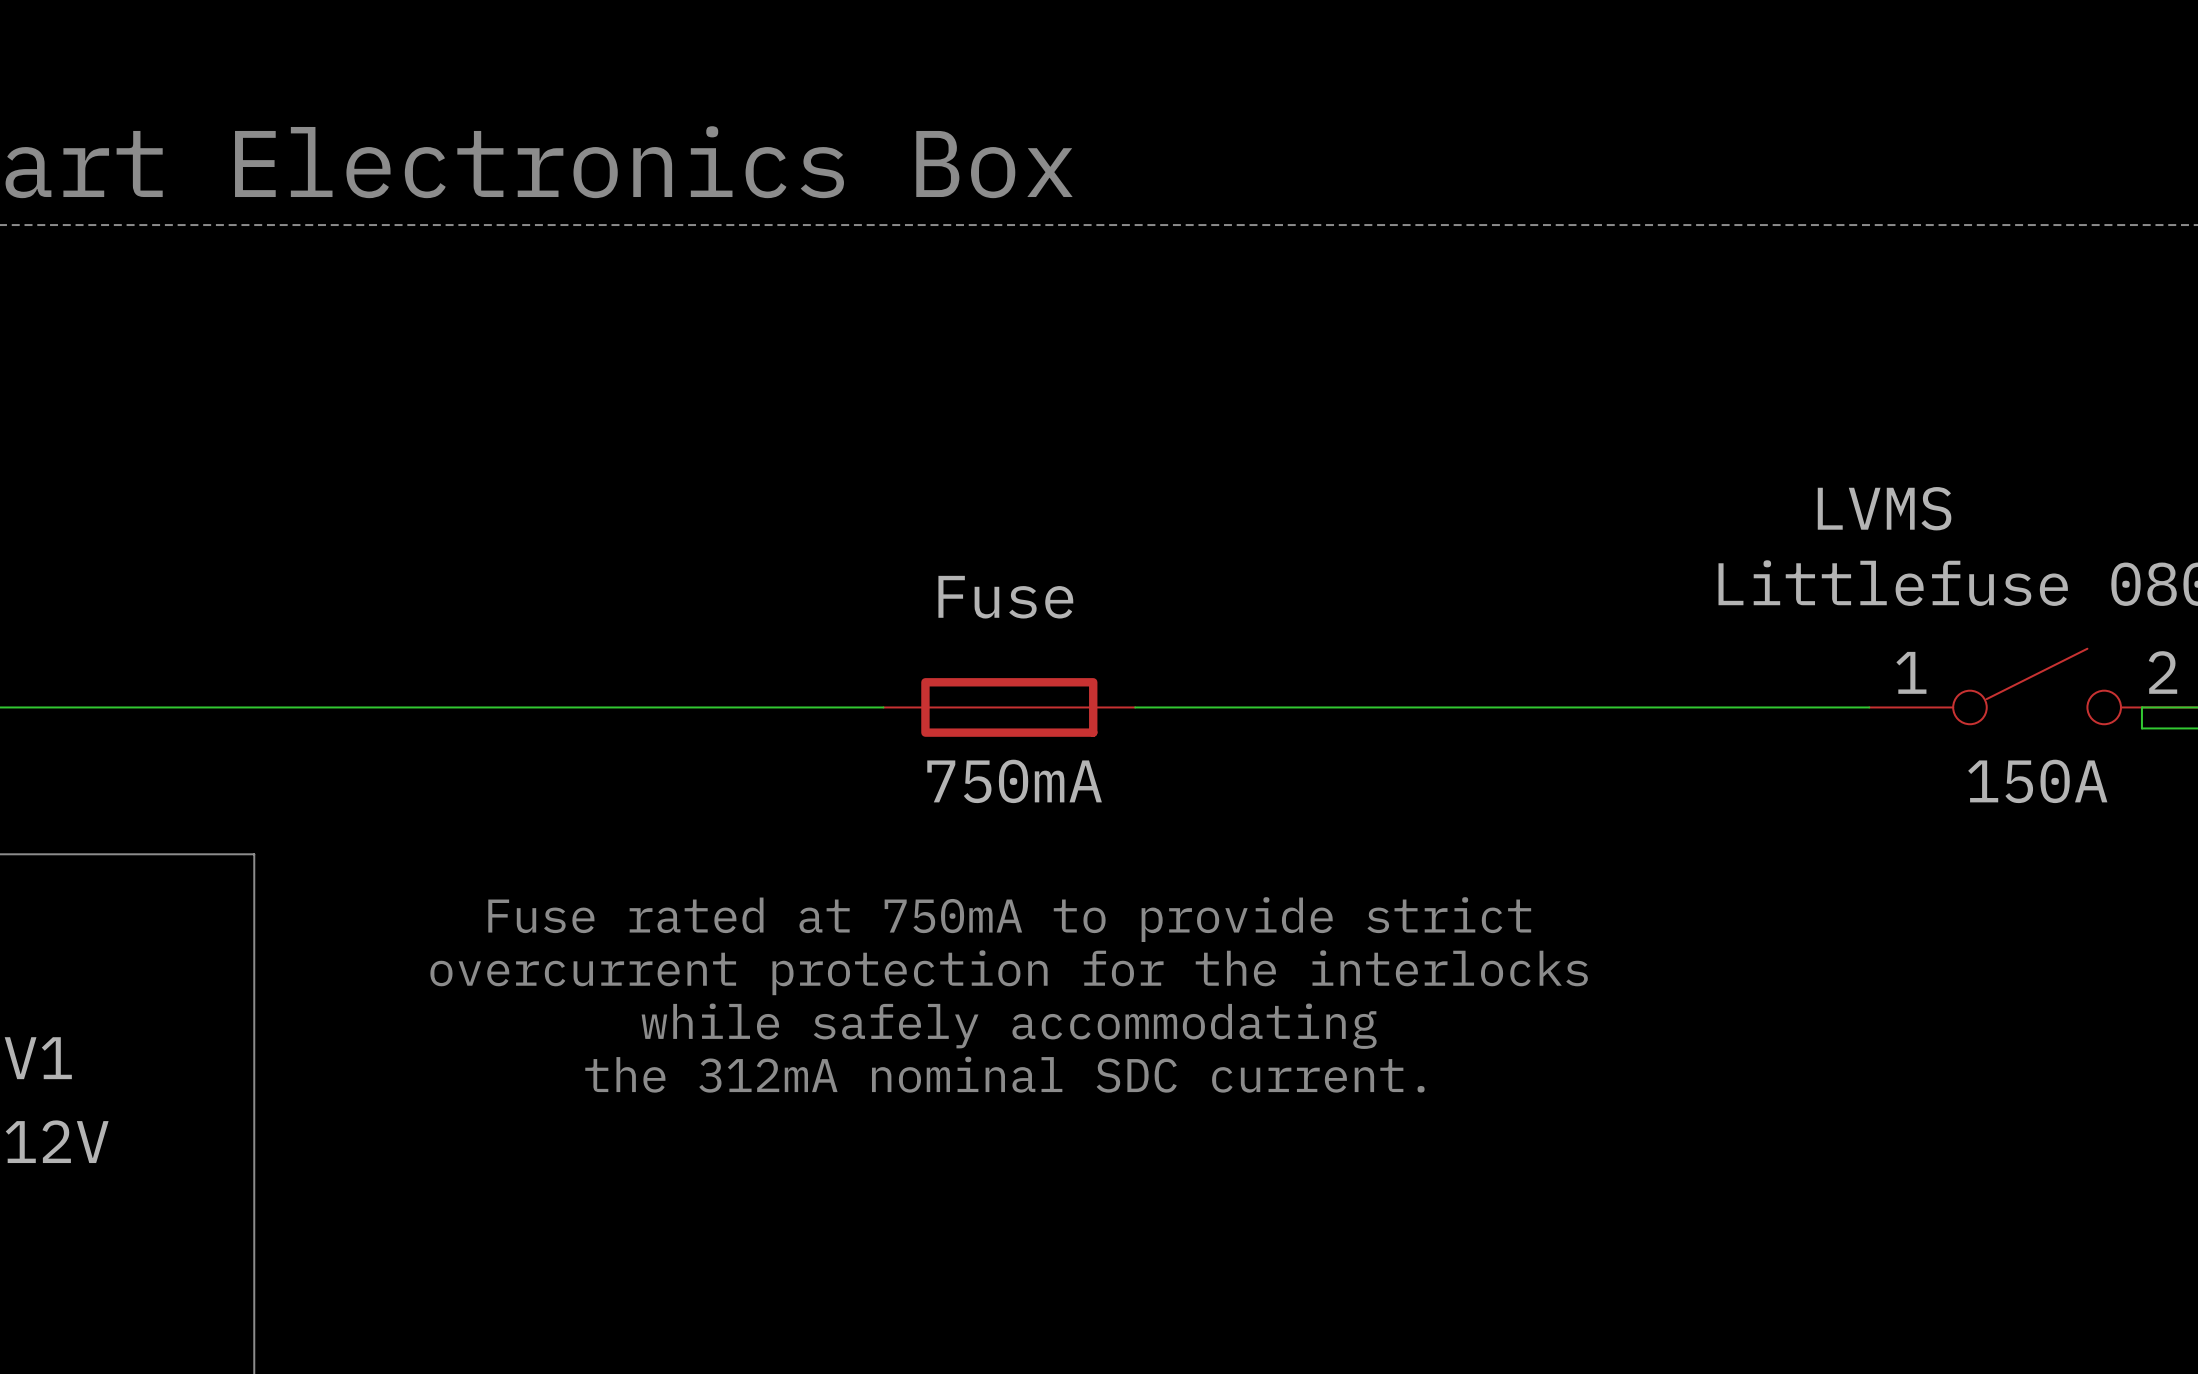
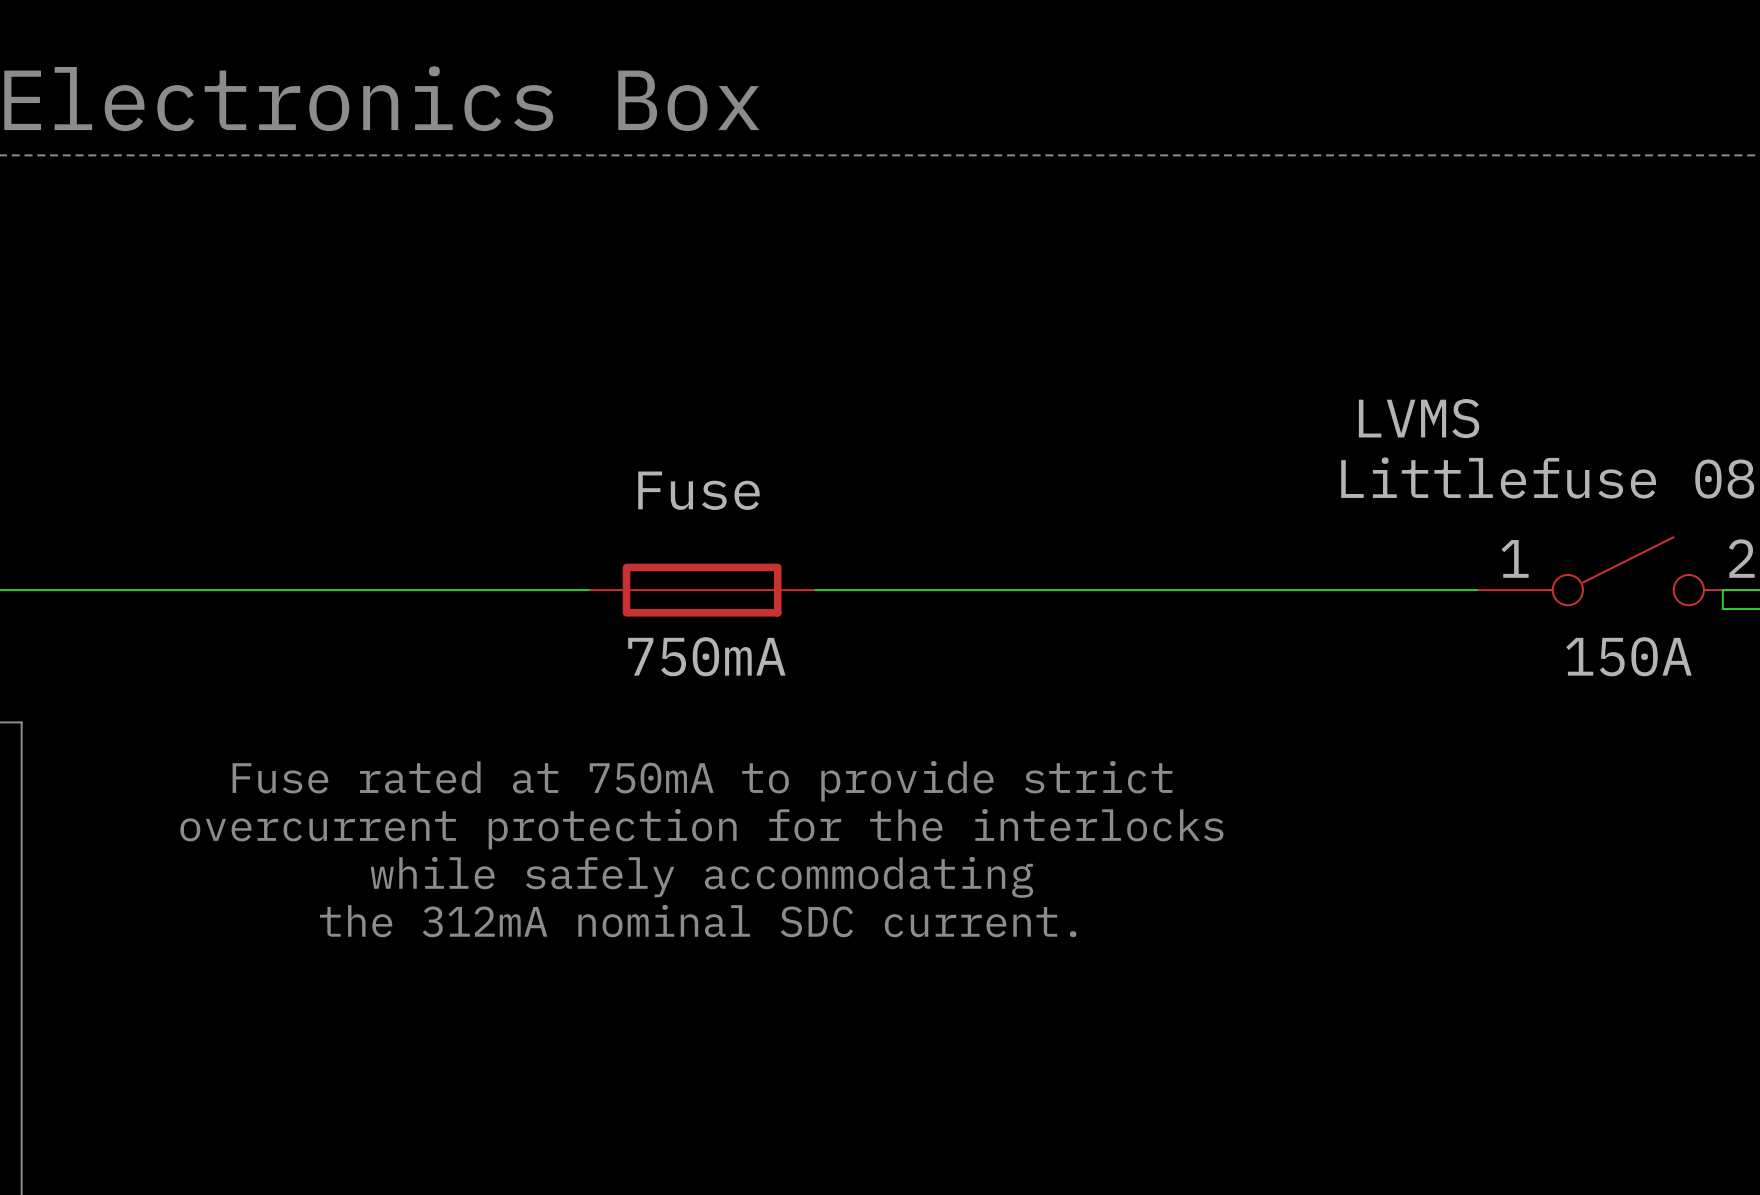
part value position: LVMS (1884, 508) -> LVMS (1419, 418)

